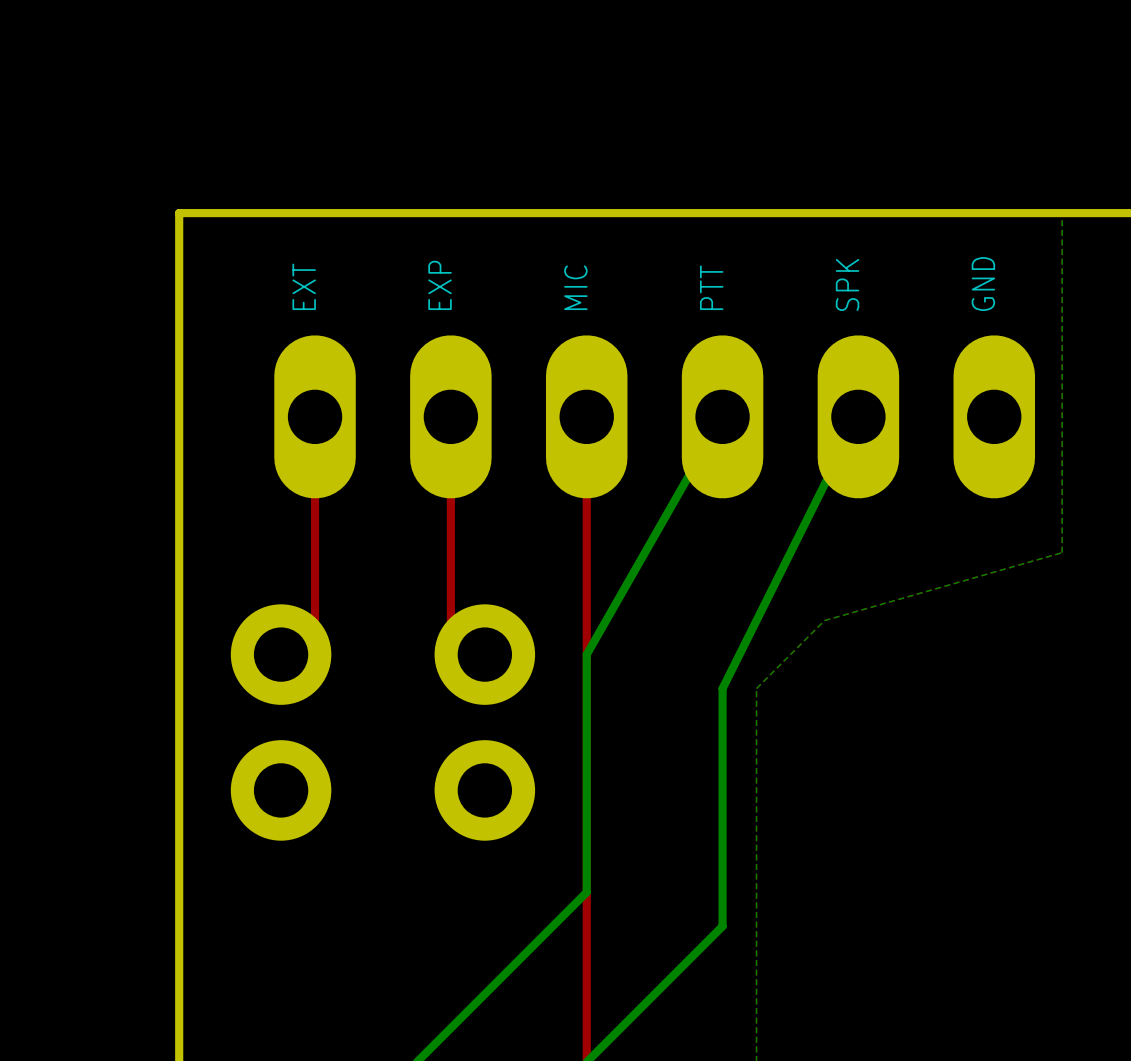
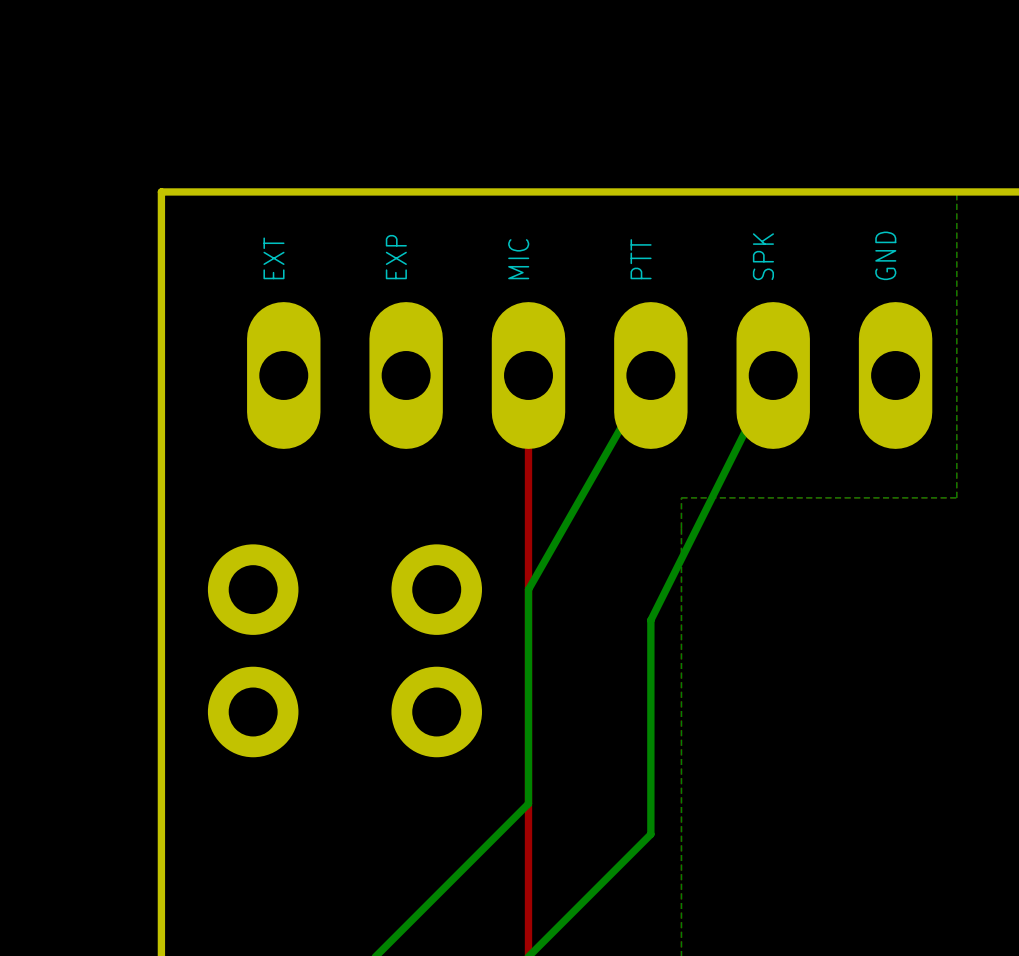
top track: (315, 416) (315, 620) (281, 654) -> none
top track: (450, 416) (450, 620) (484, 654) -> none
bottom zone outline: (1062, 552) (824, 620) (756, 688) -> (956, 497) (681, 497) (681, 620)

